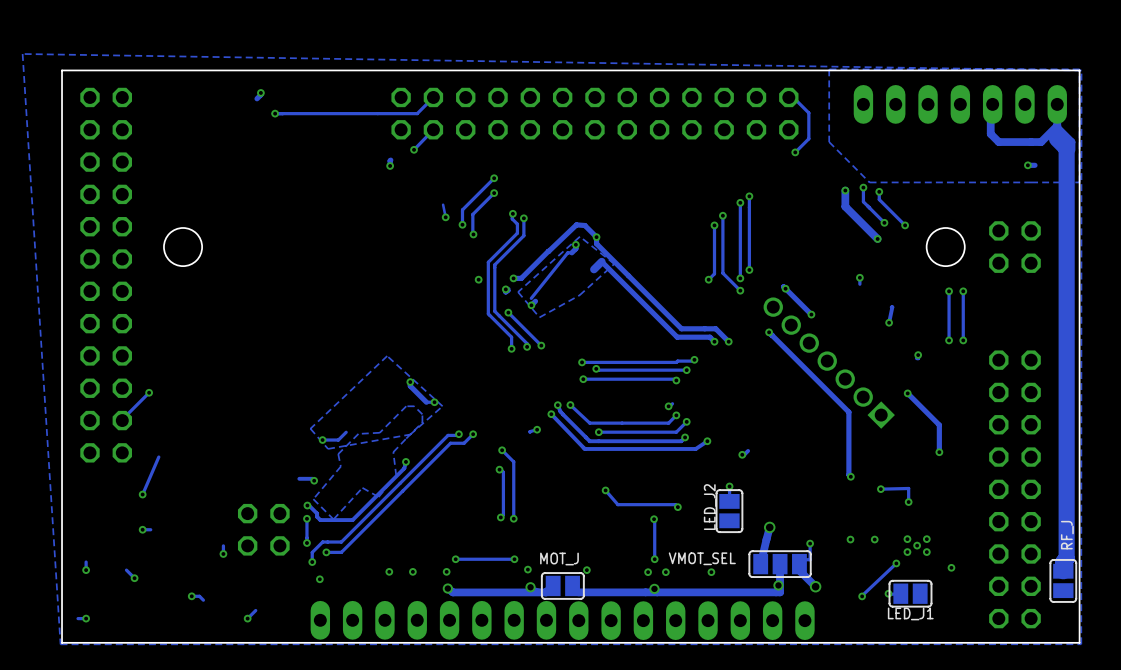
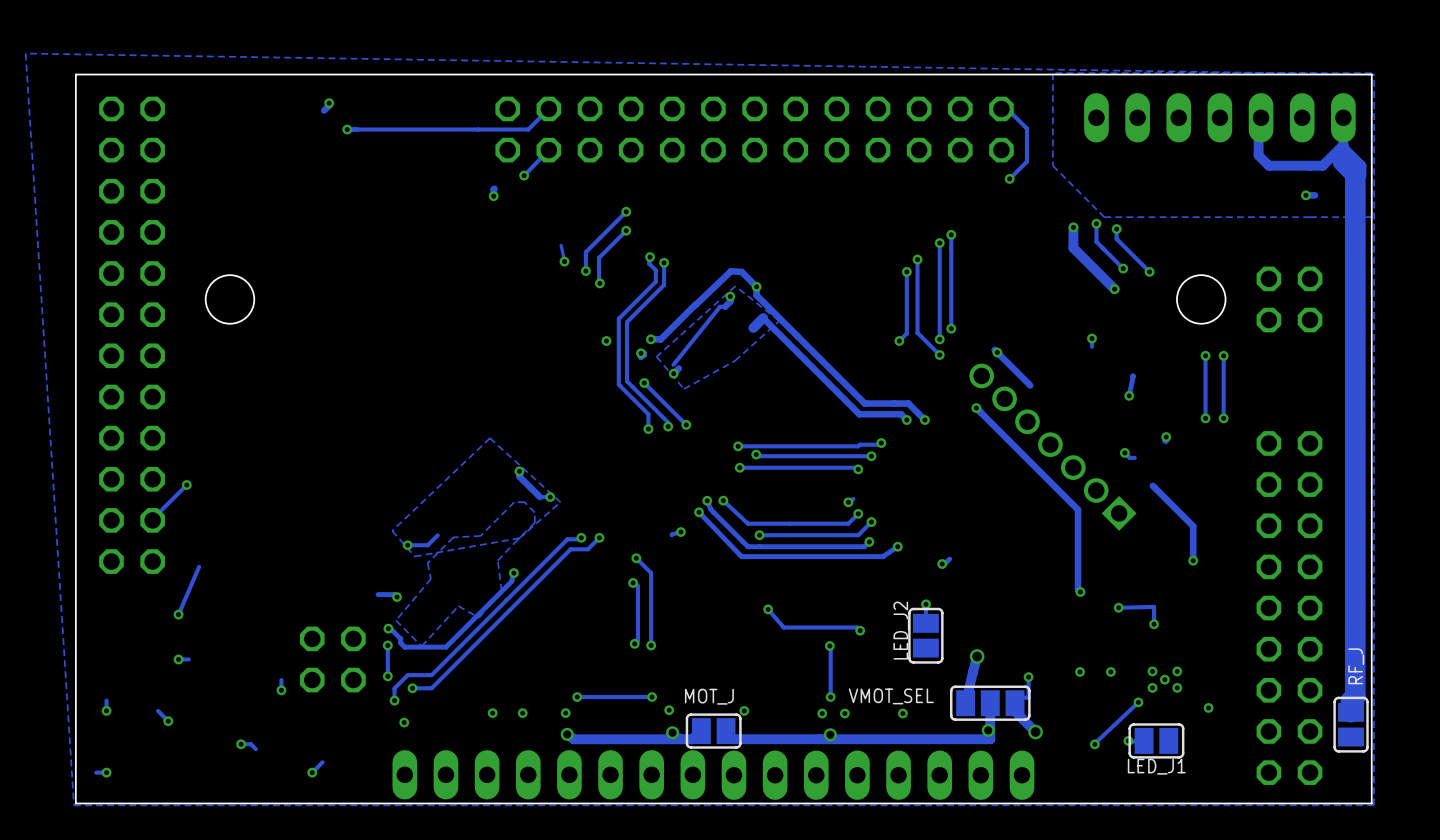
via: (811, 314) -> none
track: none -> (1124, 452) (1129, 457) (1134, 457)
via position: (907, 393) -> (1124, 452)

